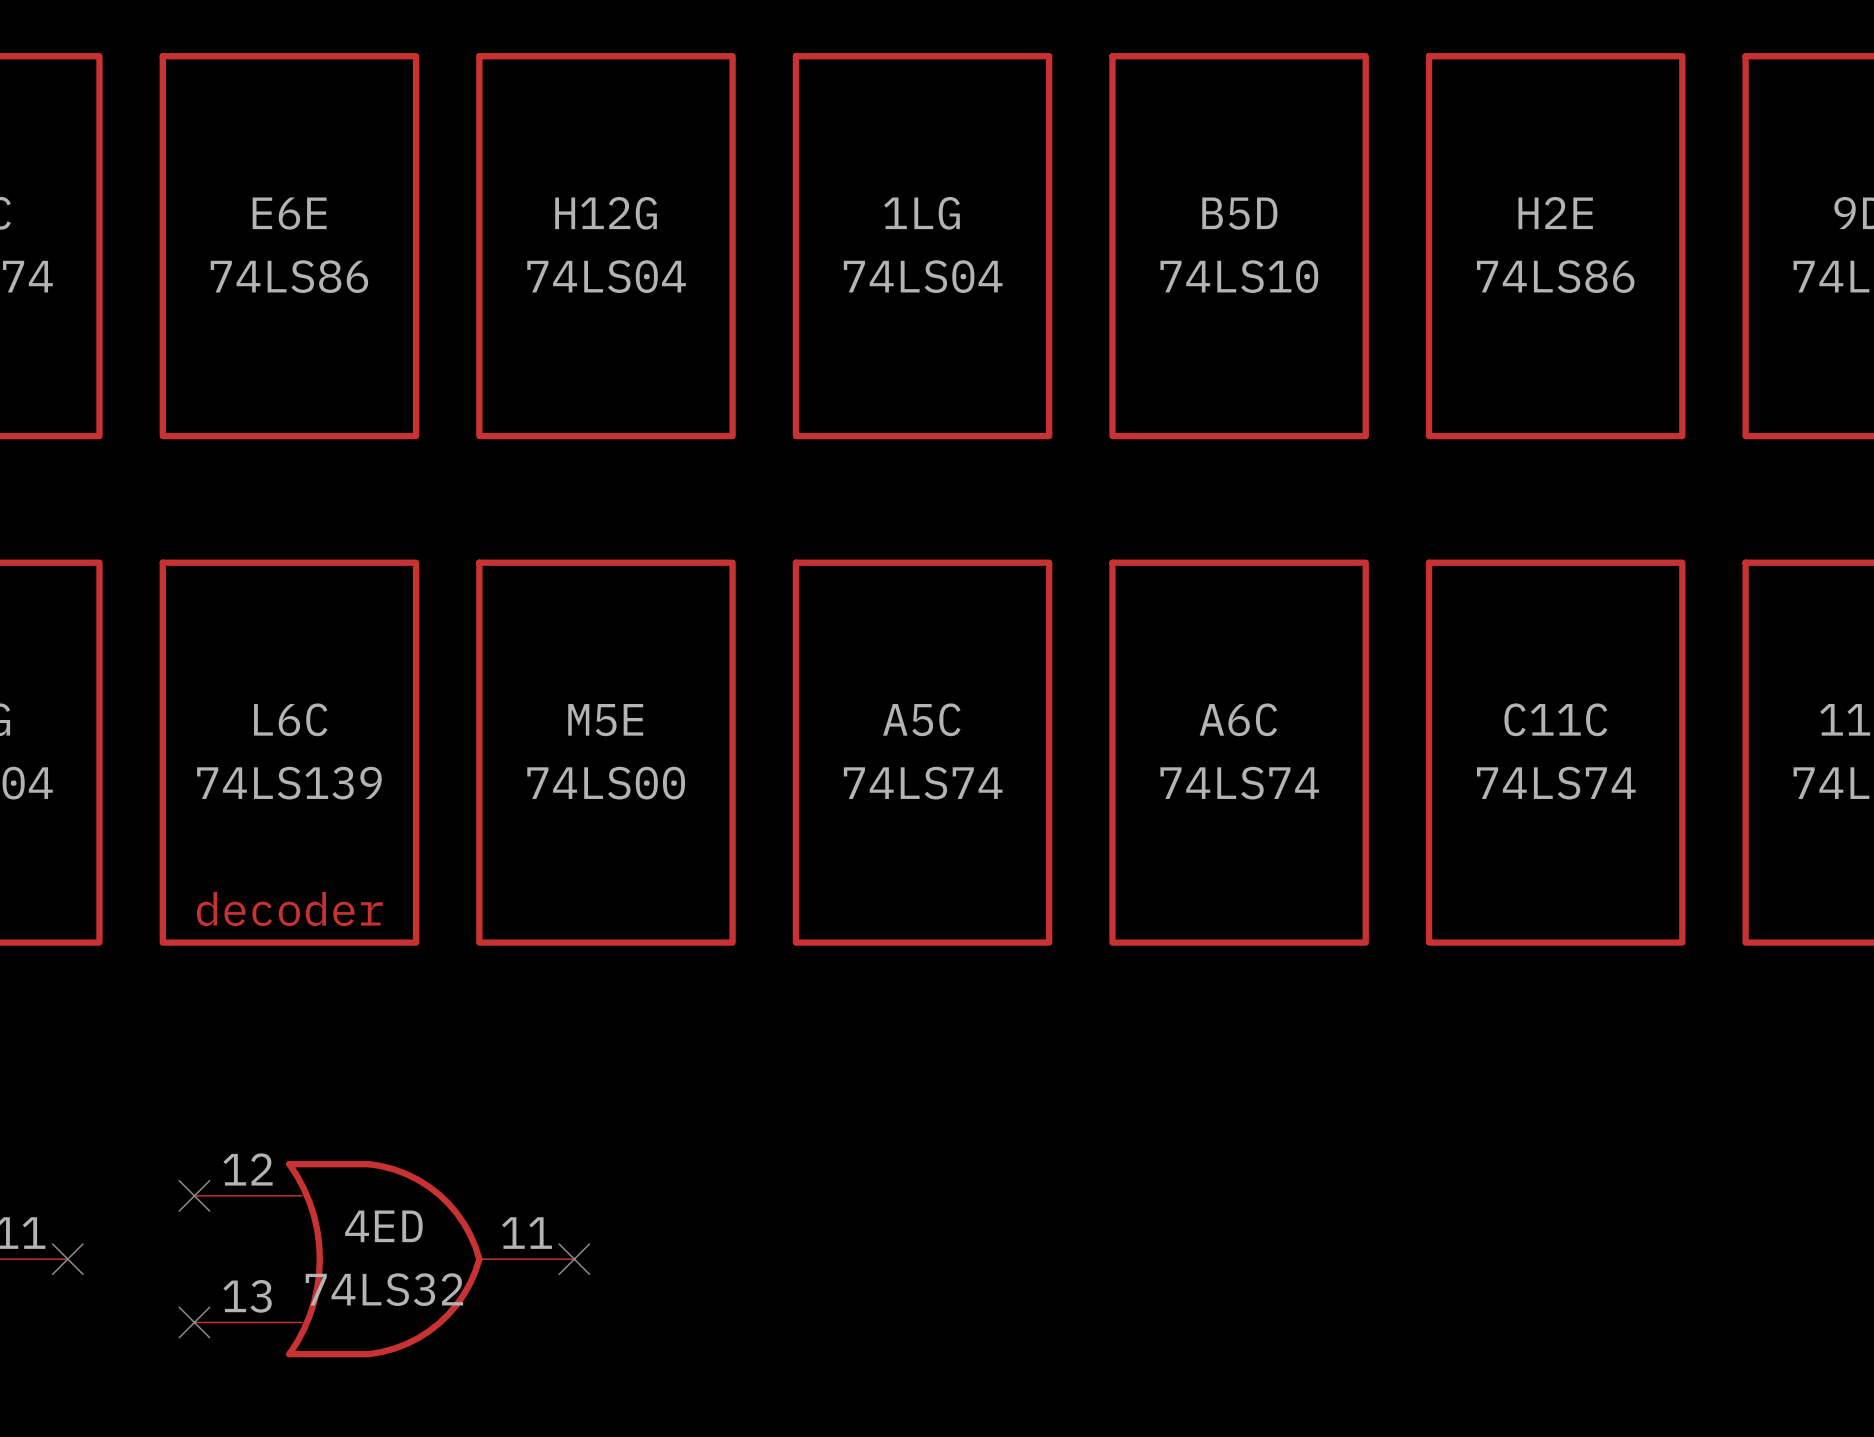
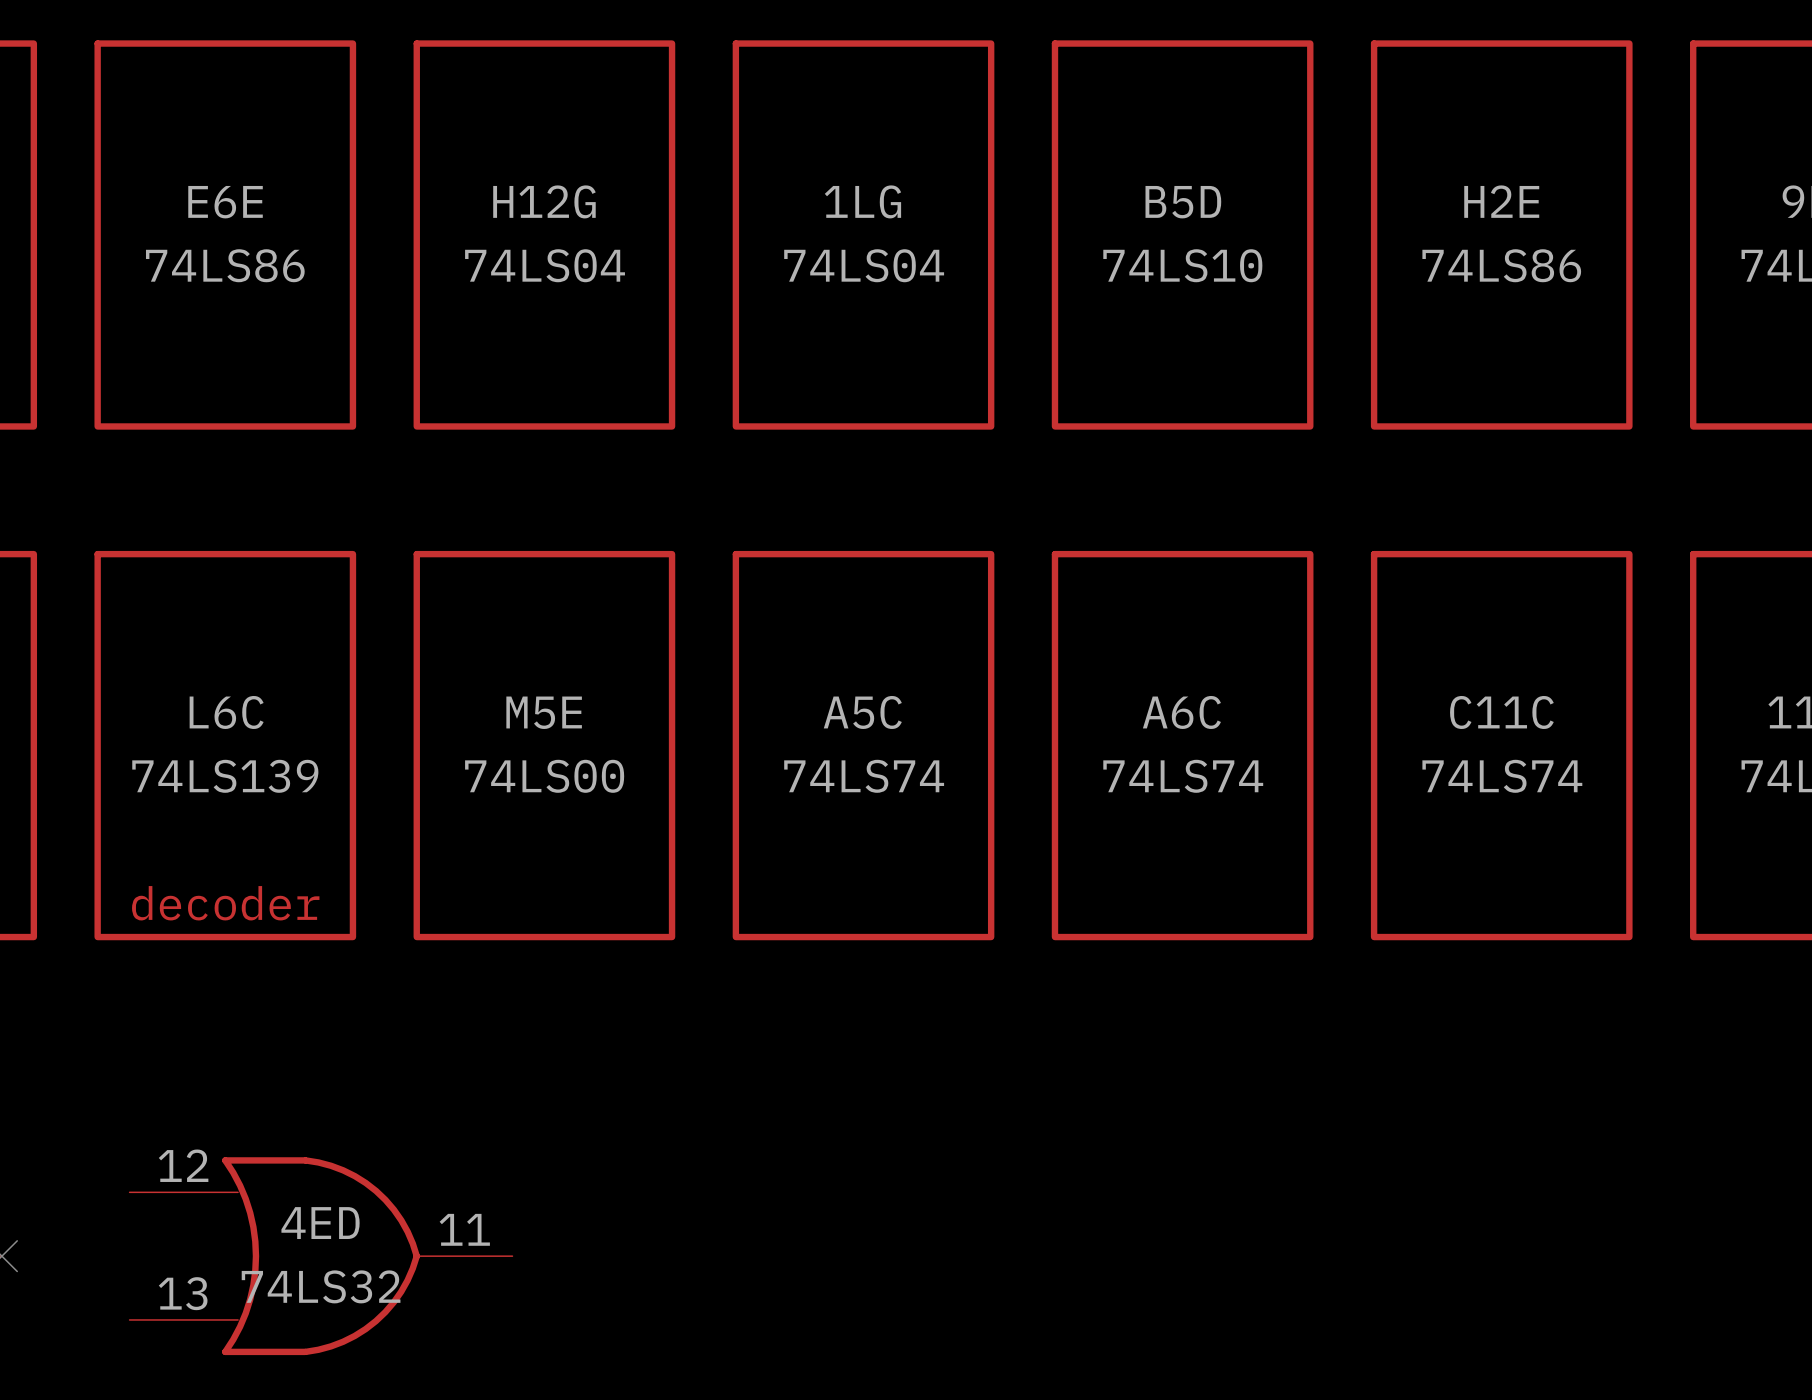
no-connect mark: (194, 1195) -> none
no-connect mark: (574, 1259) -> none
no-connect mark: (194, 1322) -> none

